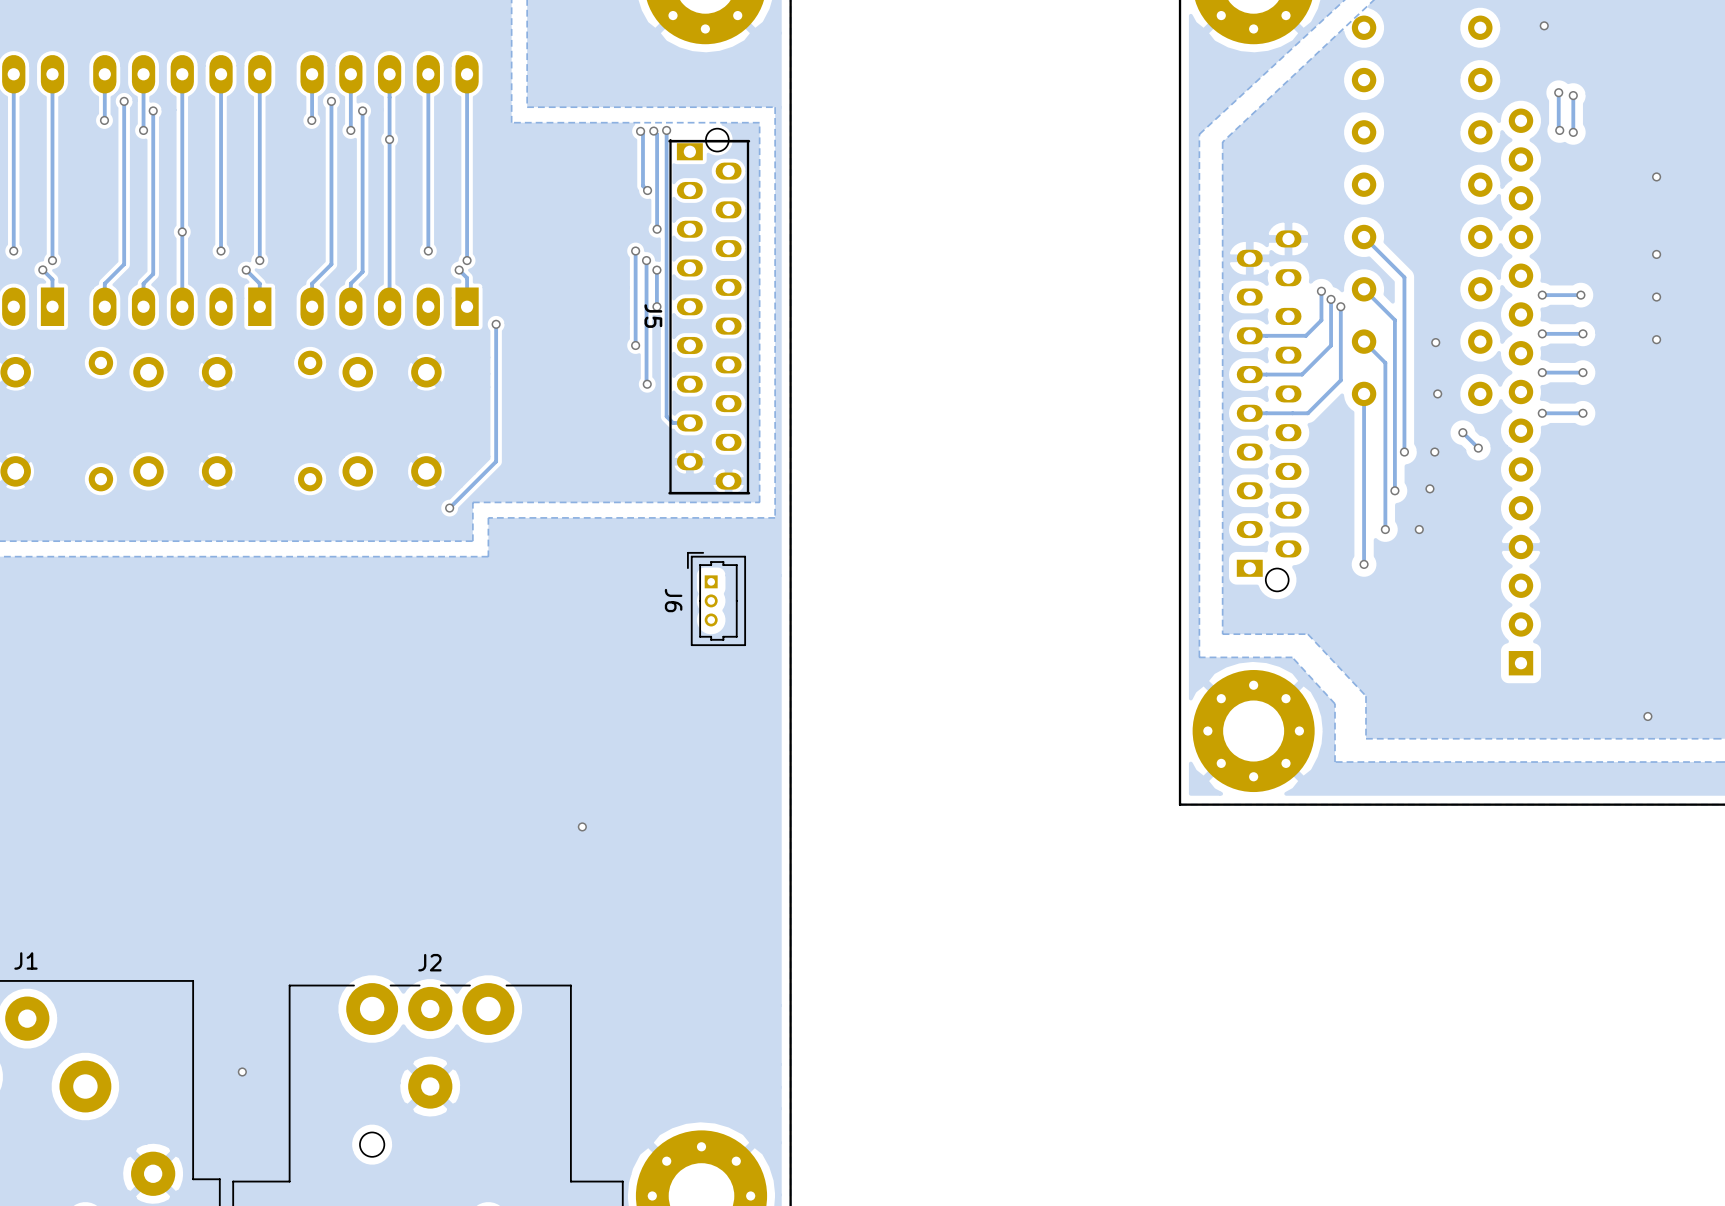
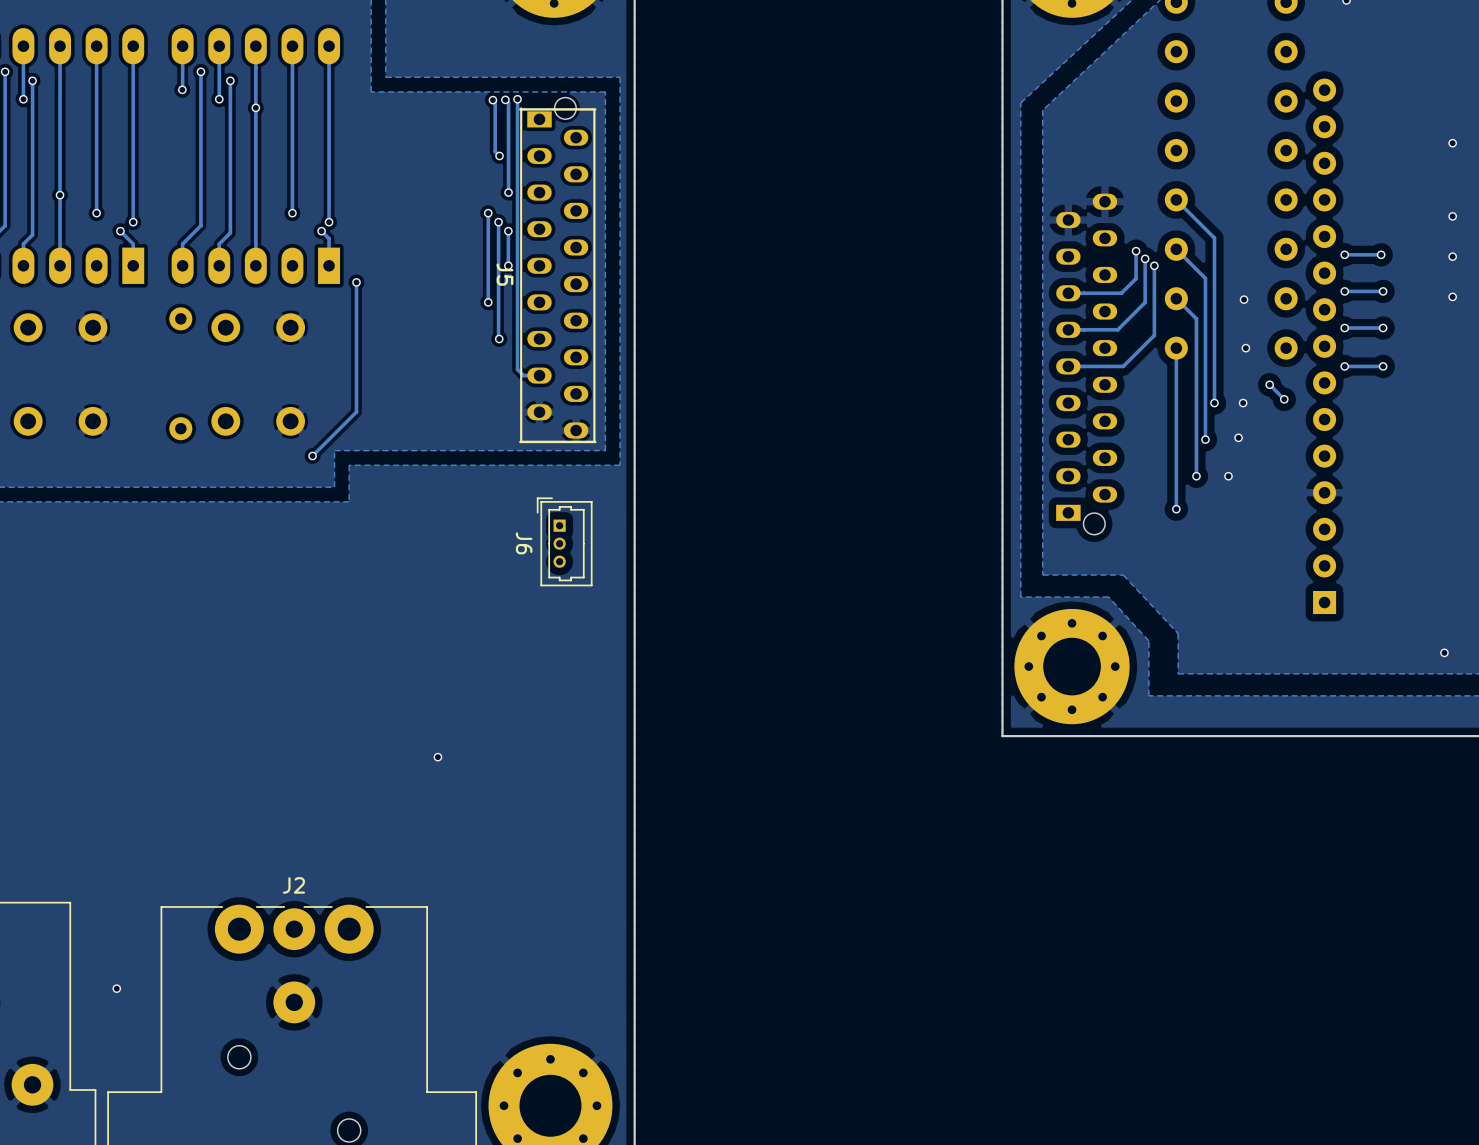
track: (1558, 92) (1559, 130) -> none
via: (1558, 92) -> none
track: (1573, 95) (1573, 132) -> none
via: (1573, 95) -> none
via: (1559, 130) -> none
via: (1573, 132) -> none

